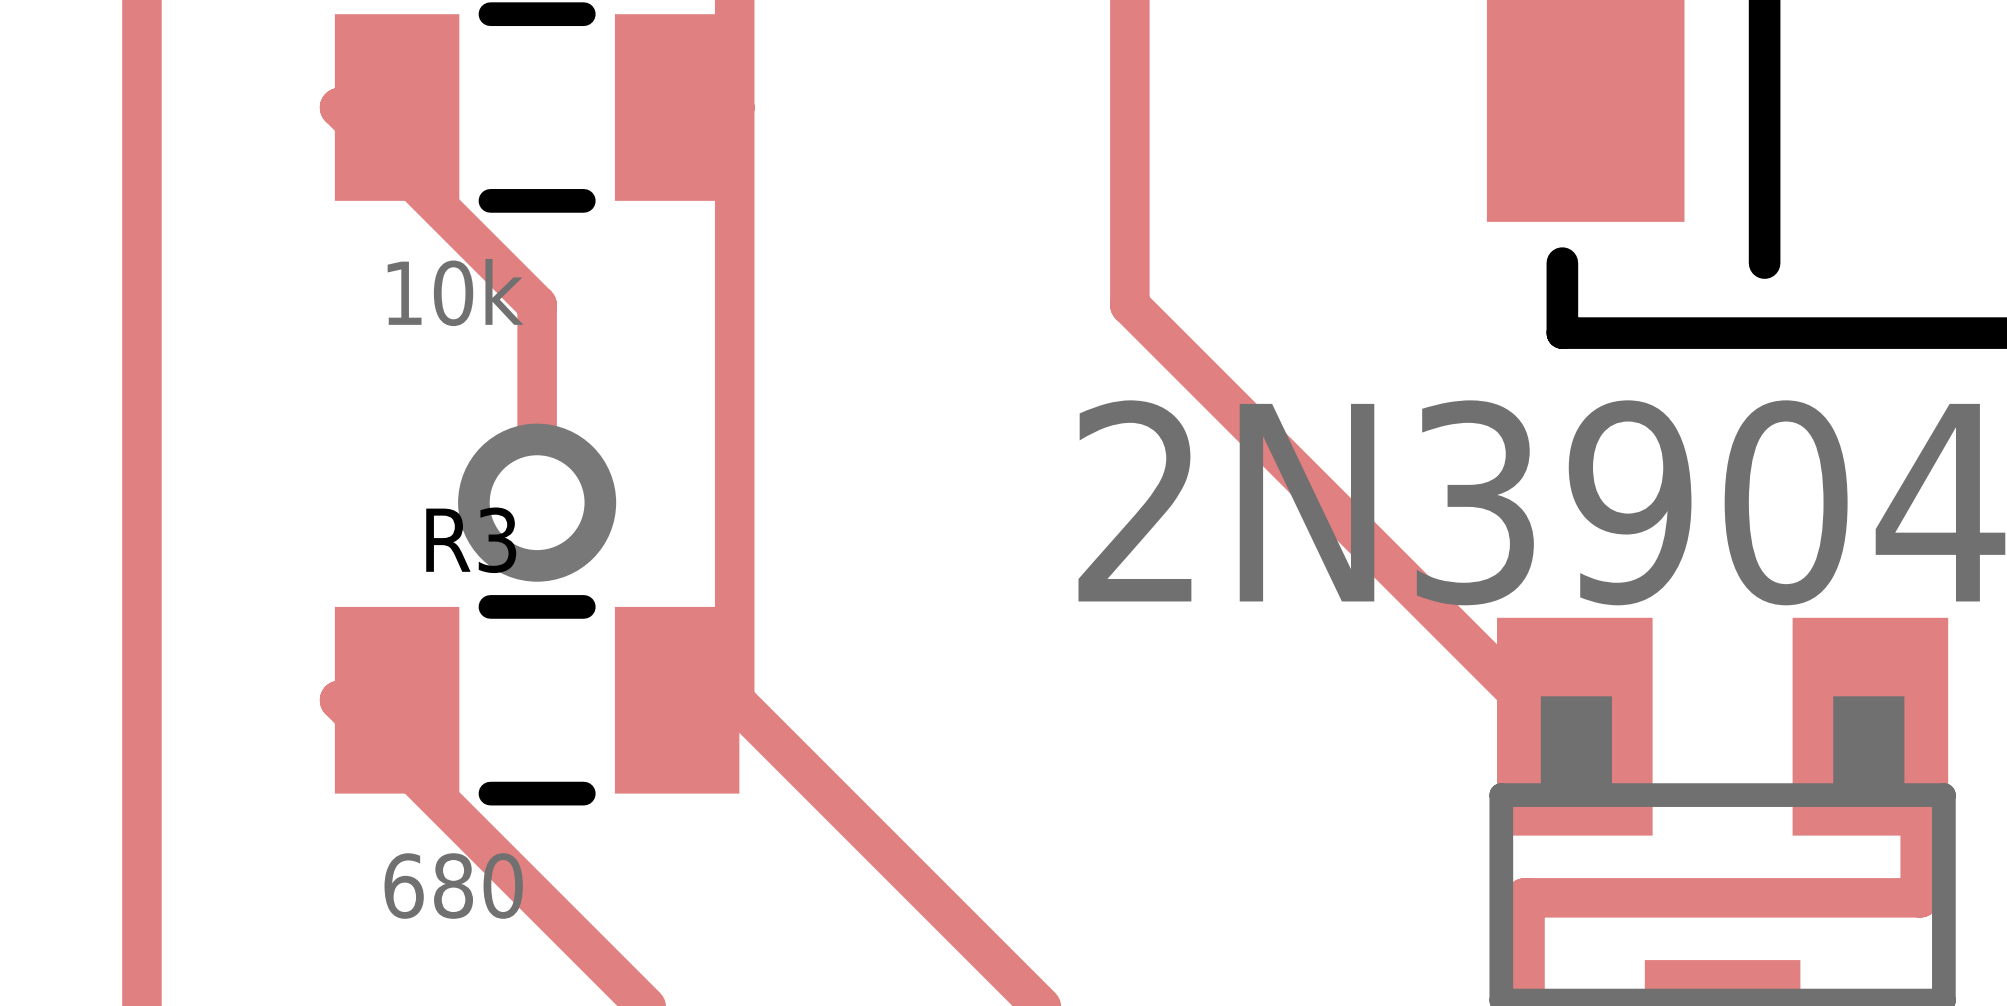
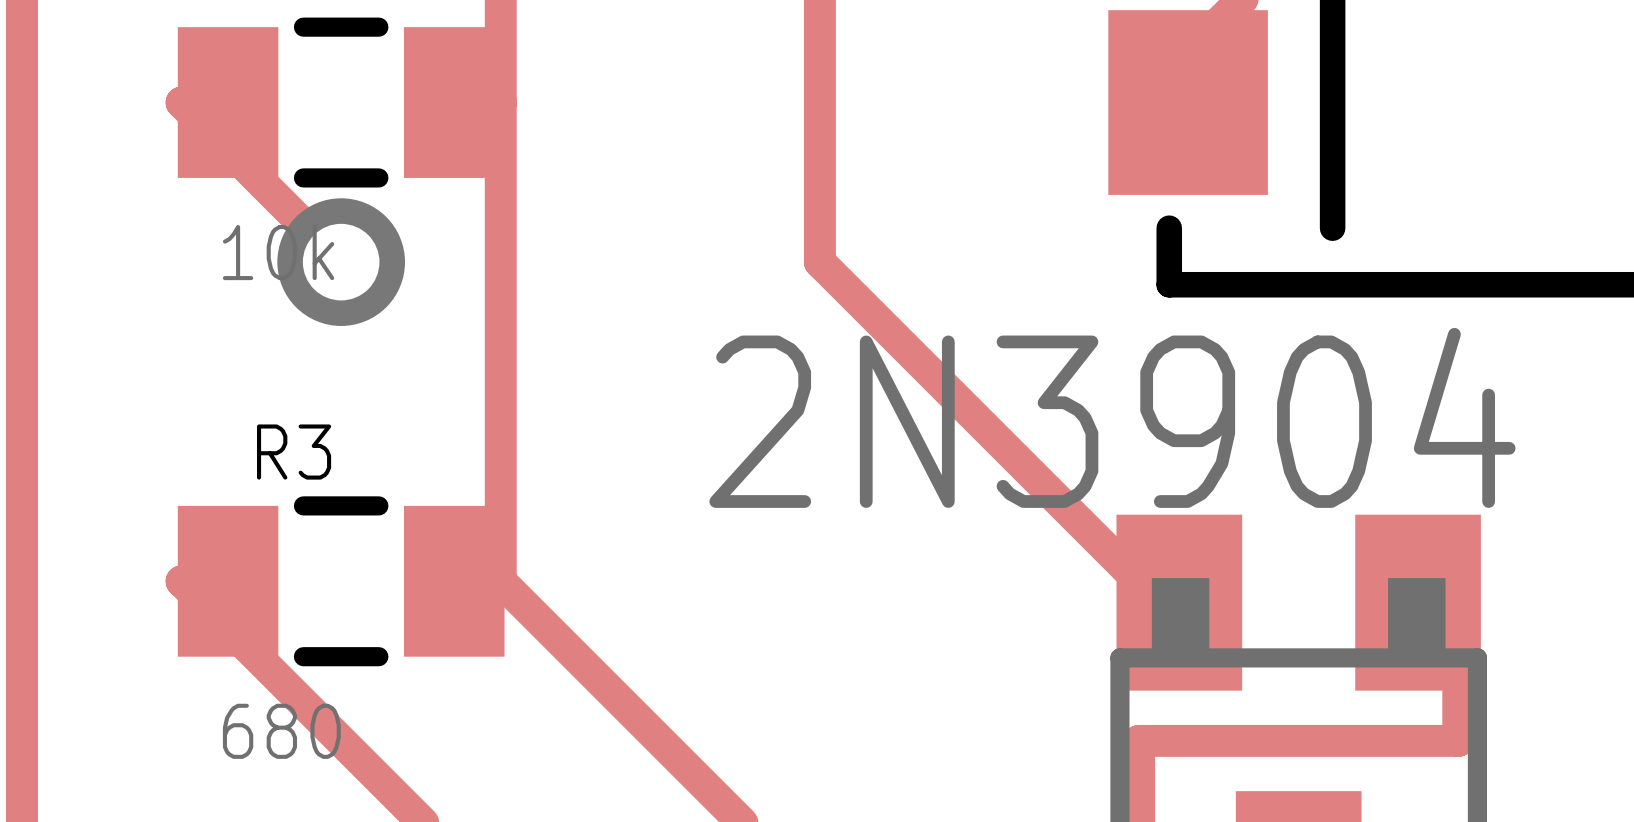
track: (537, 305) (537, 502) -> none
via position: (537, 502) -> (341, 262)

